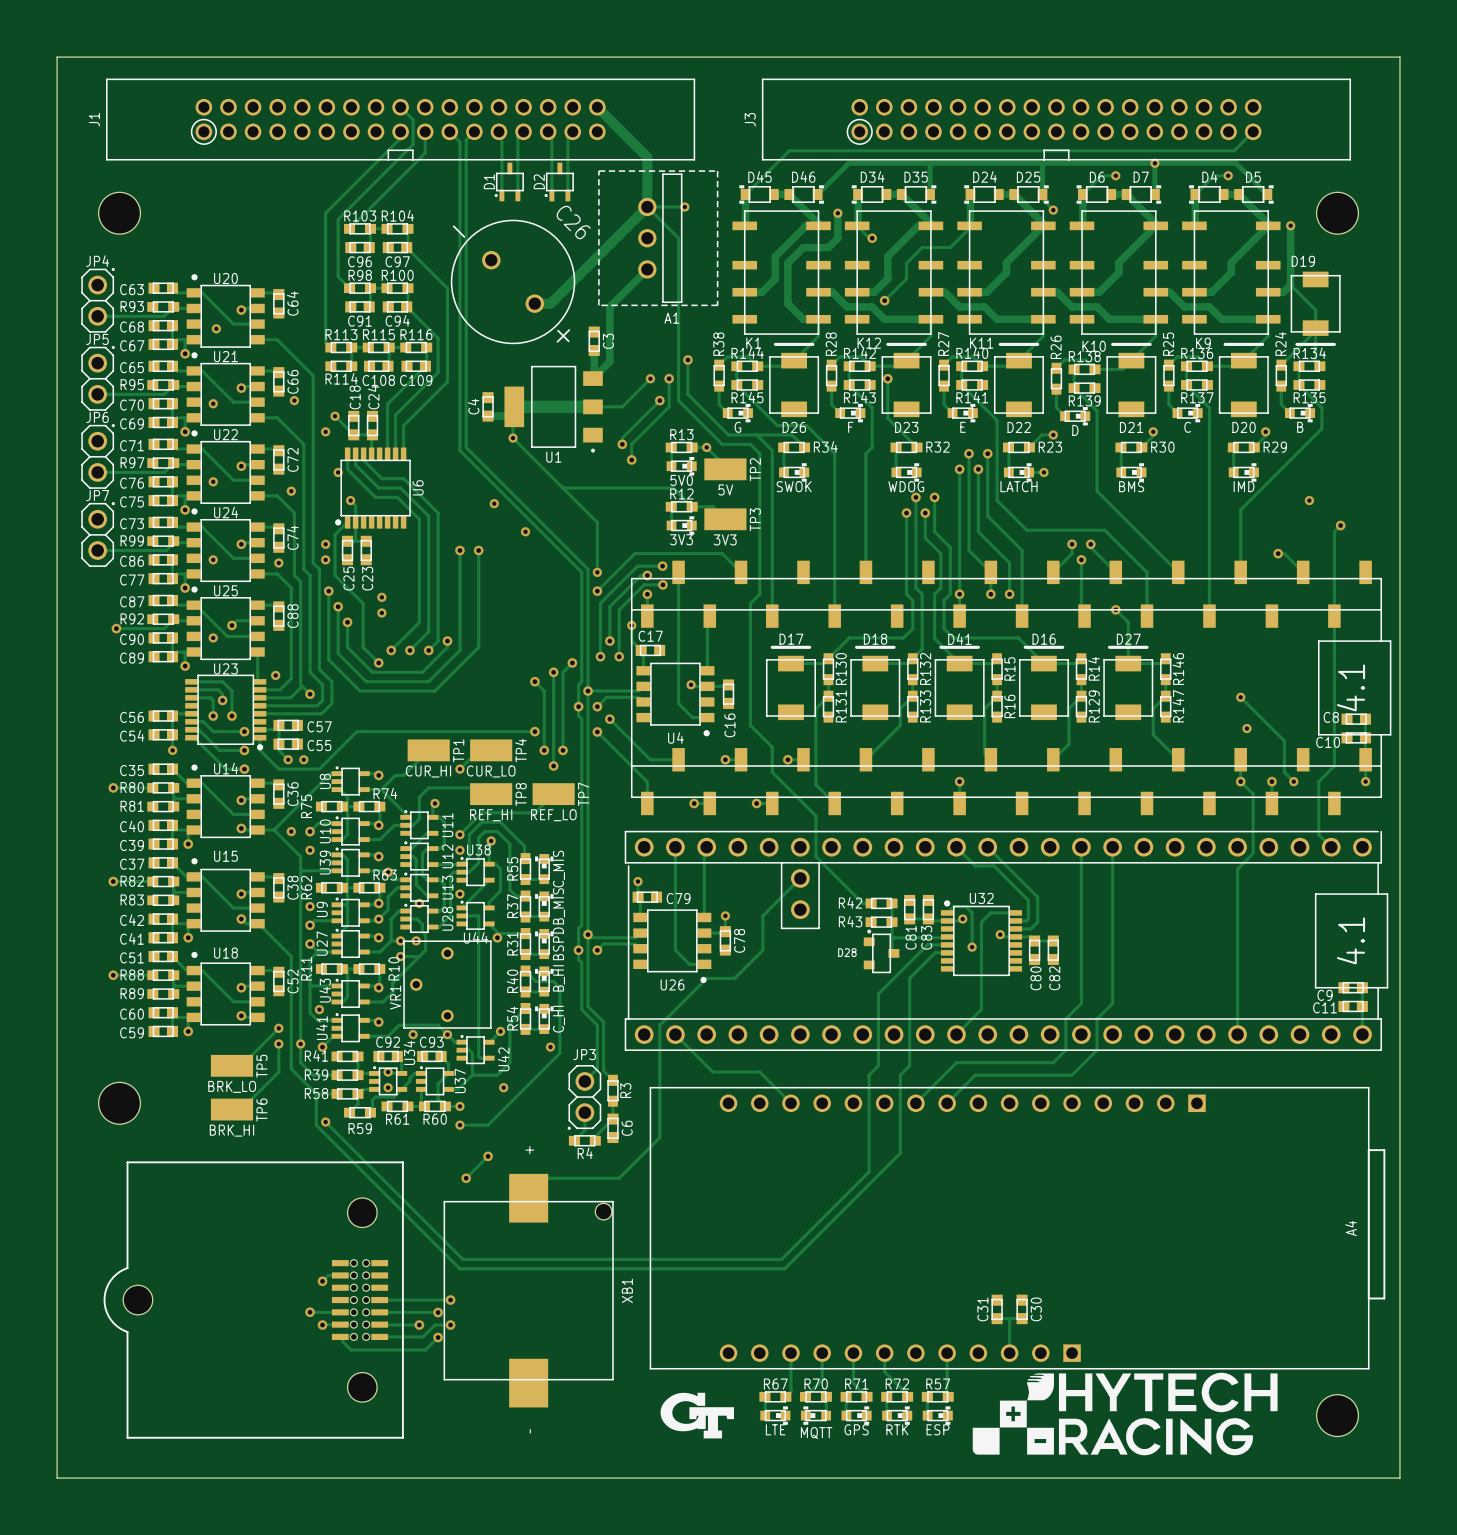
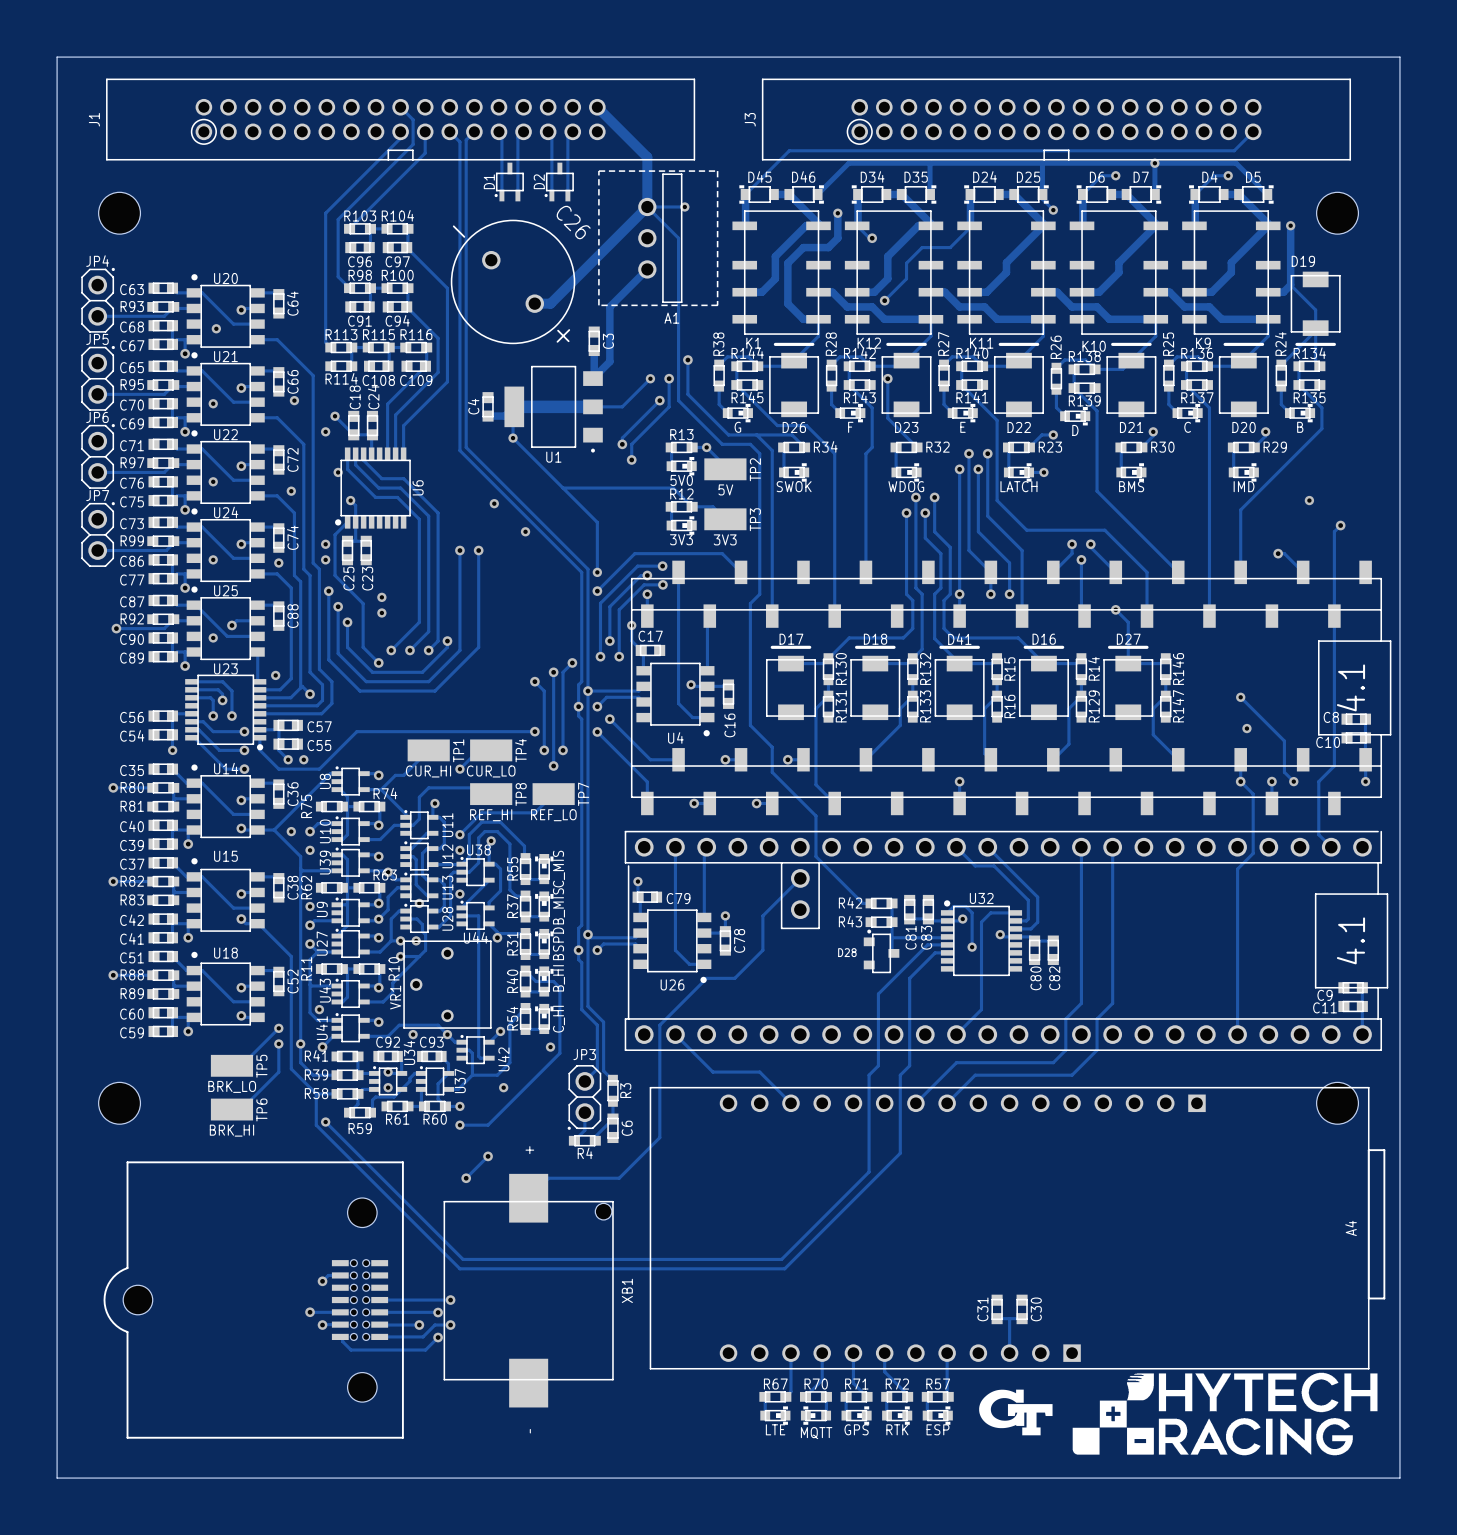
part: none -> (1337, 1103)
drawing: none -> [979, 1389, 1053, 1436]
drawing: [660, 1392, 734, 1439] -> none
drawing position: (1125, 1414) -> (1225, 1414)
part: (1337, 1415) -> none

